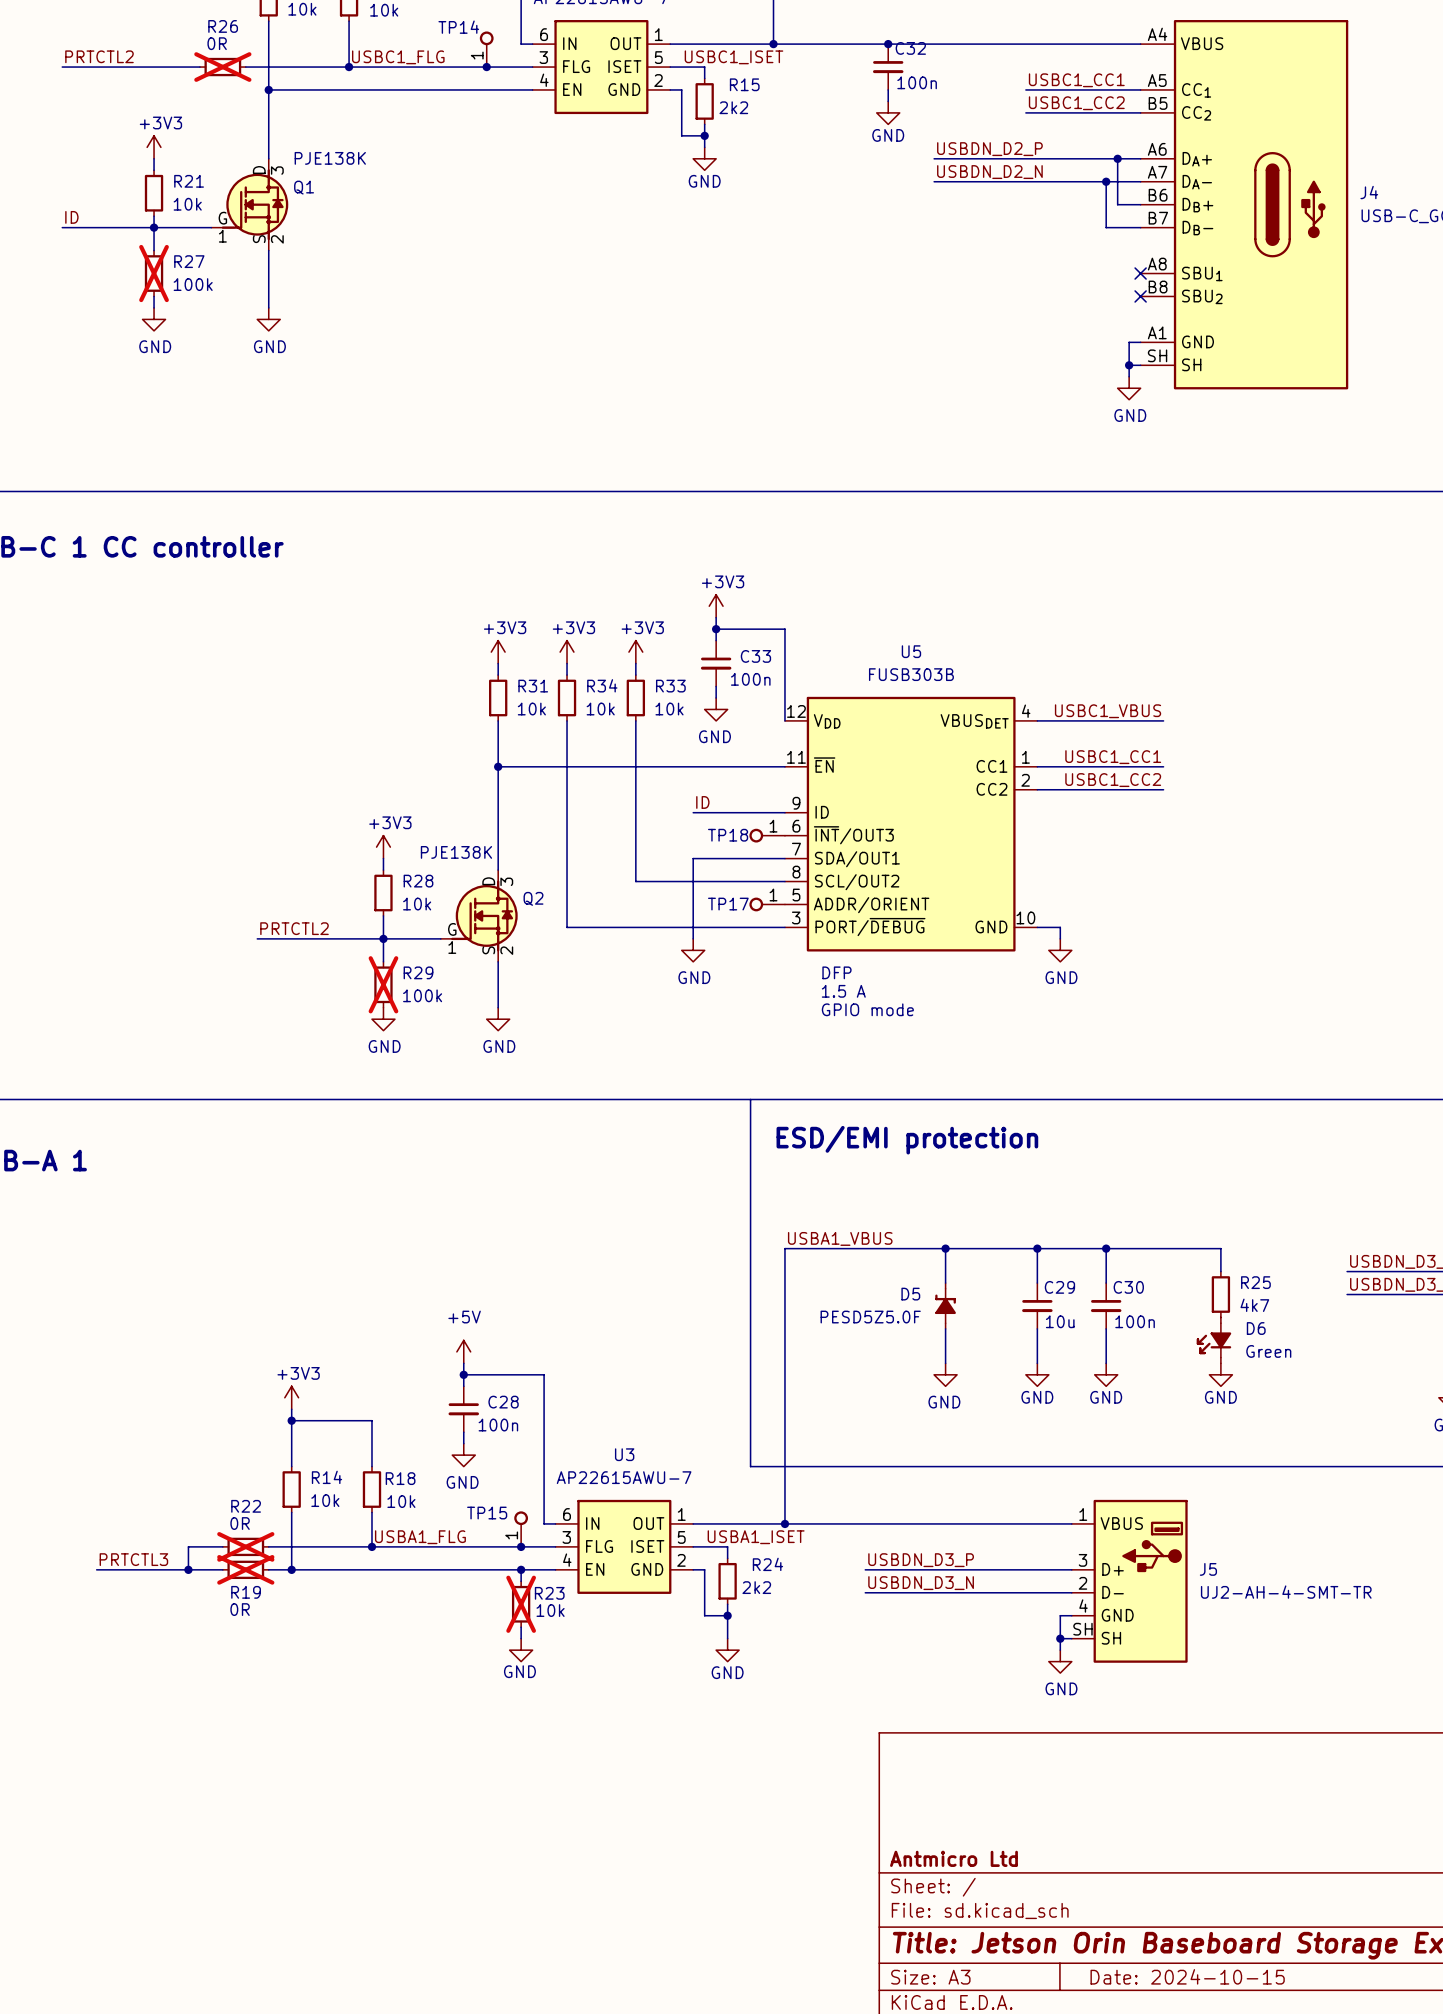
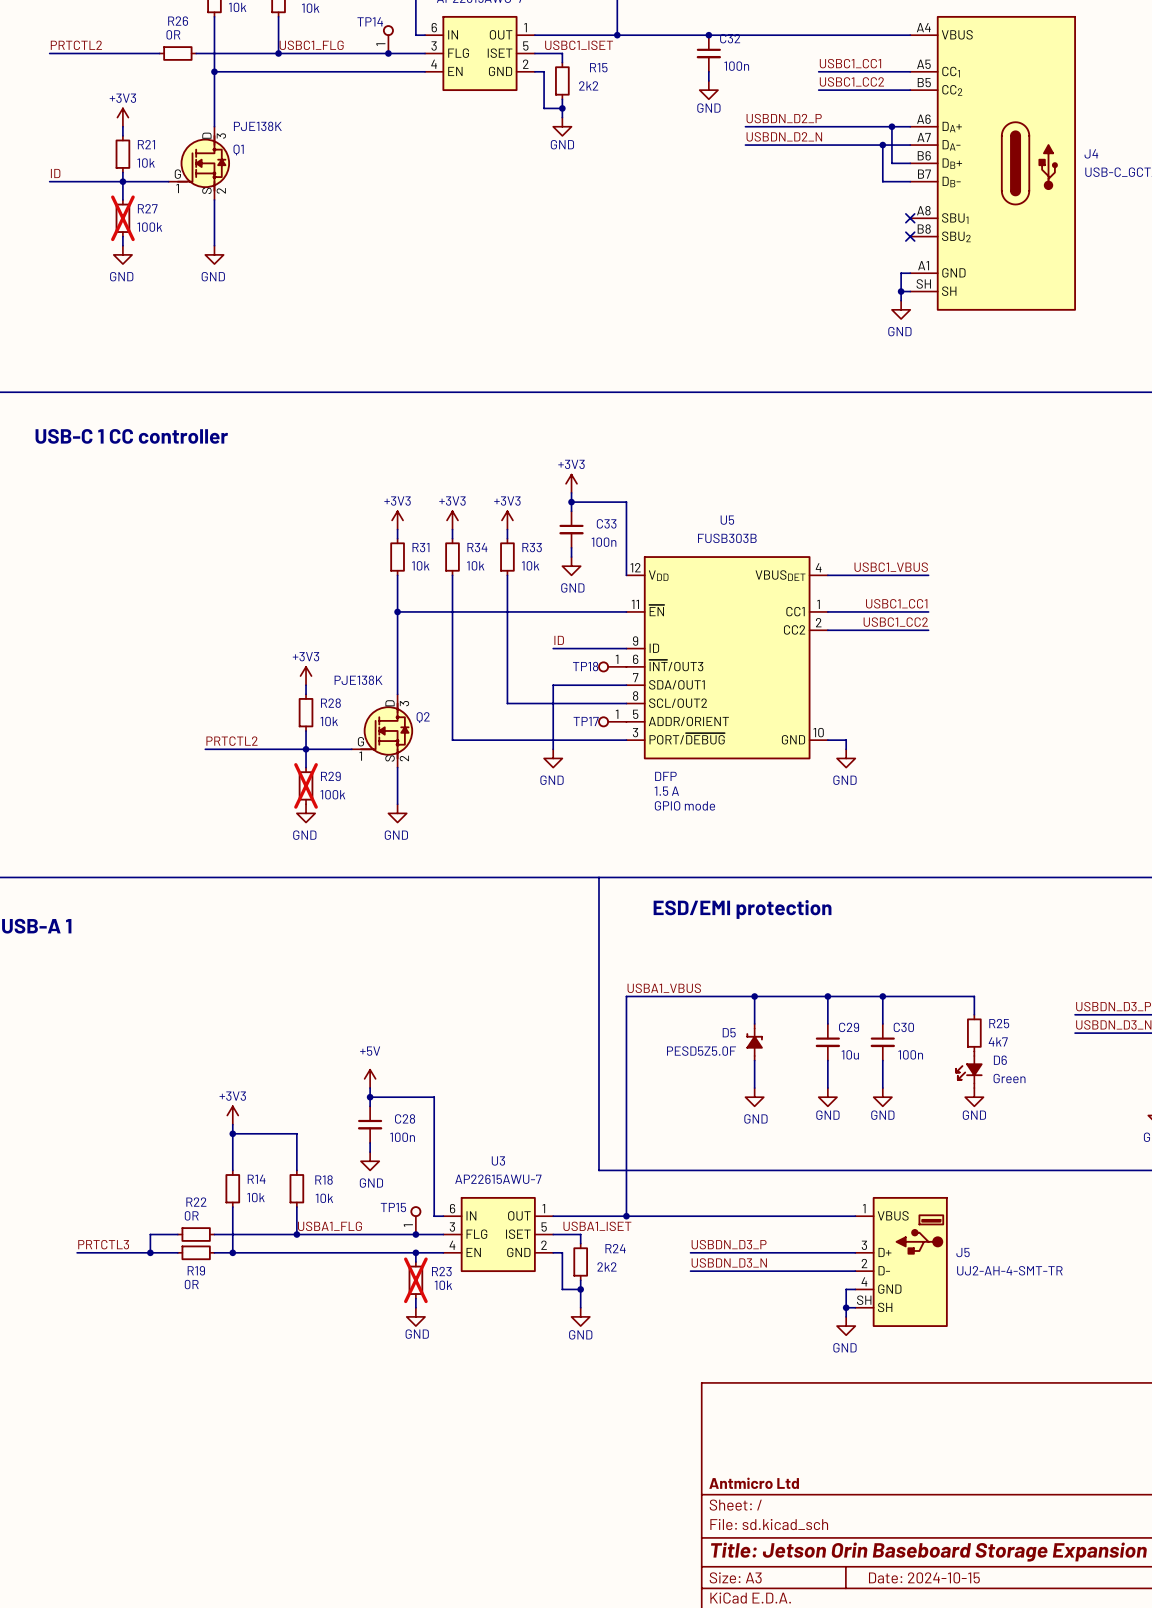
R26 do-not-place cross: (222, 67) -> none
R22 do-not-place cross: (245, 1546) -> none
R19 do-not-place cross: (245, 1569) -> none

